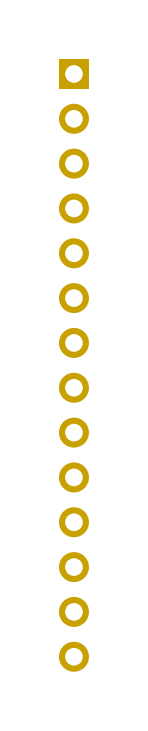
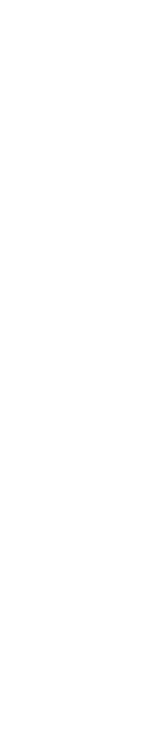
part: (73, 365) -> none

